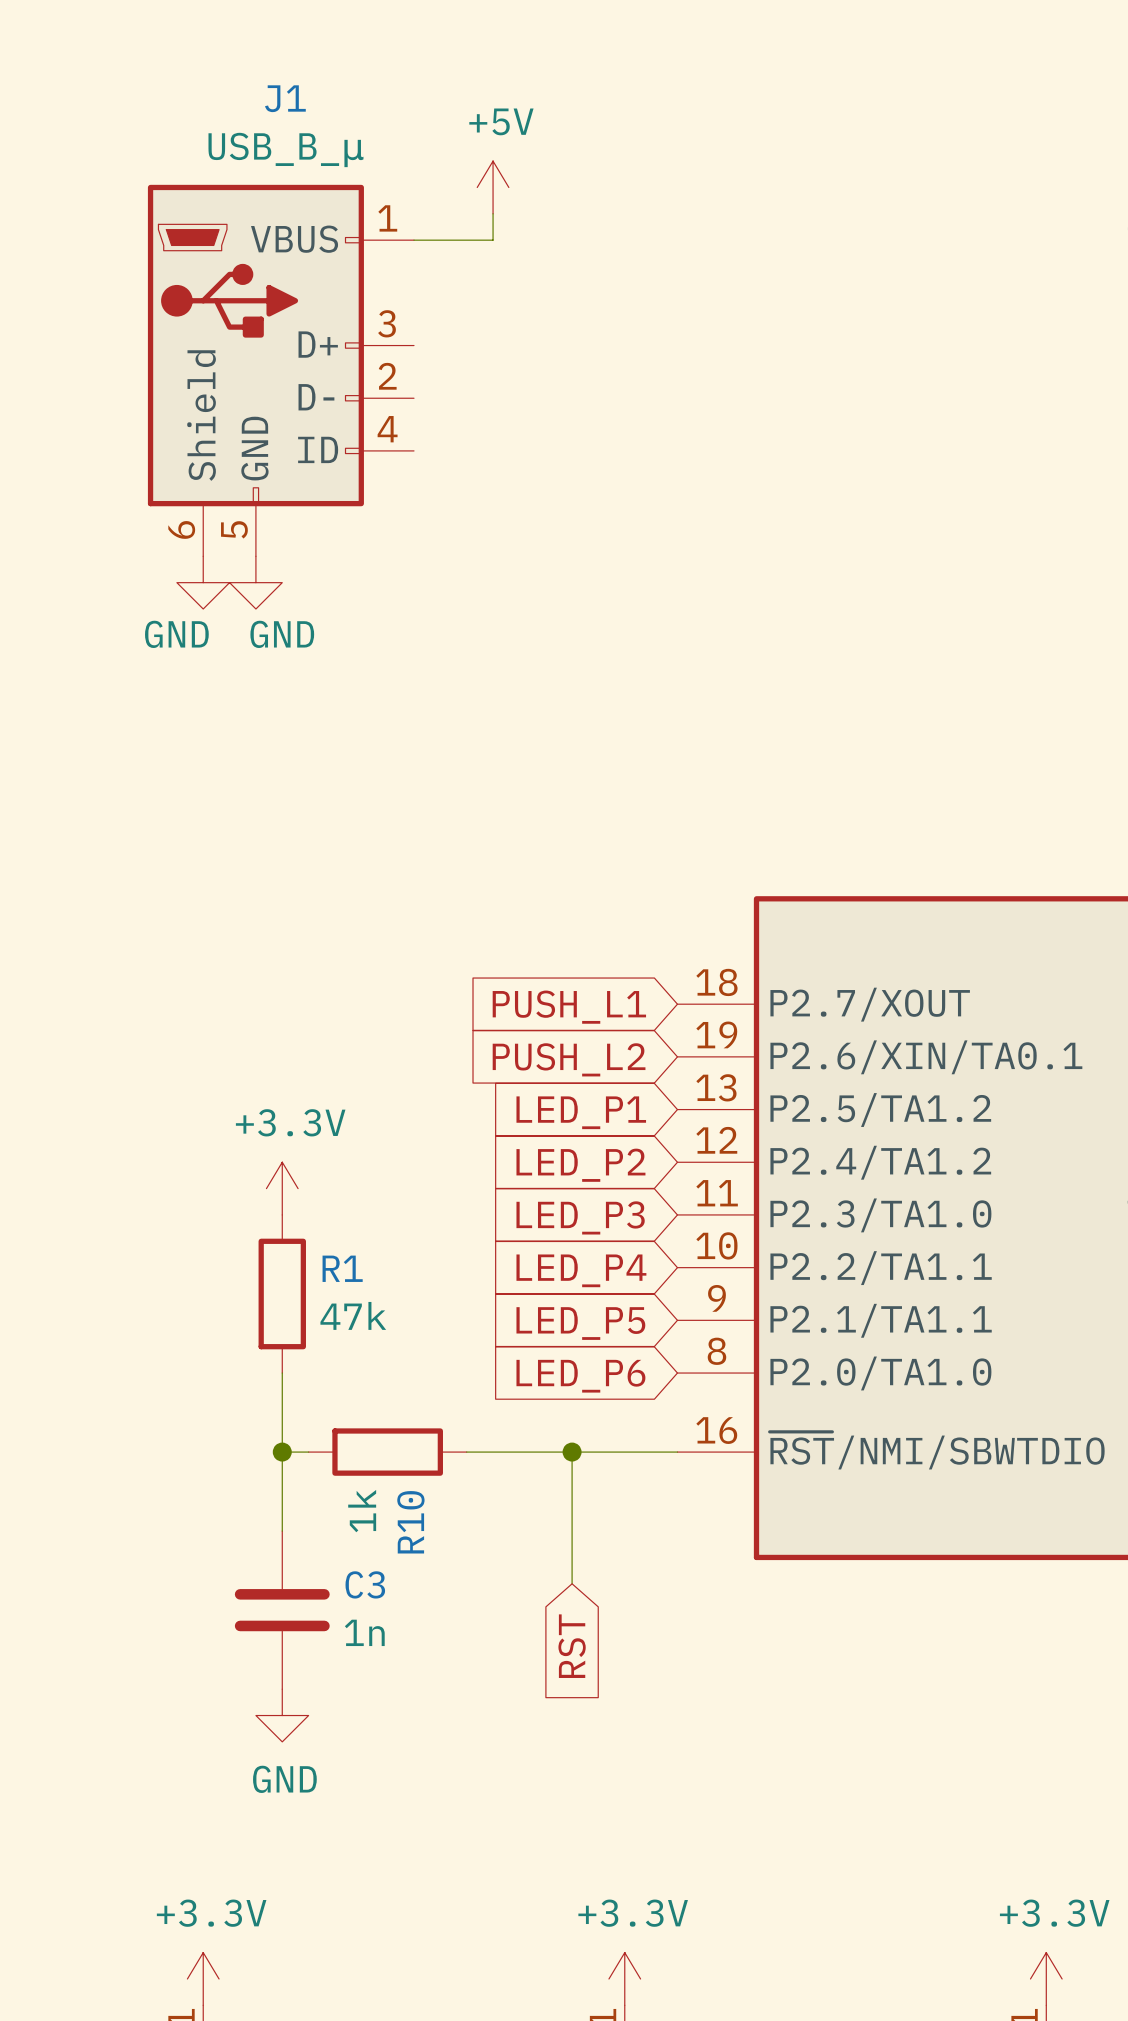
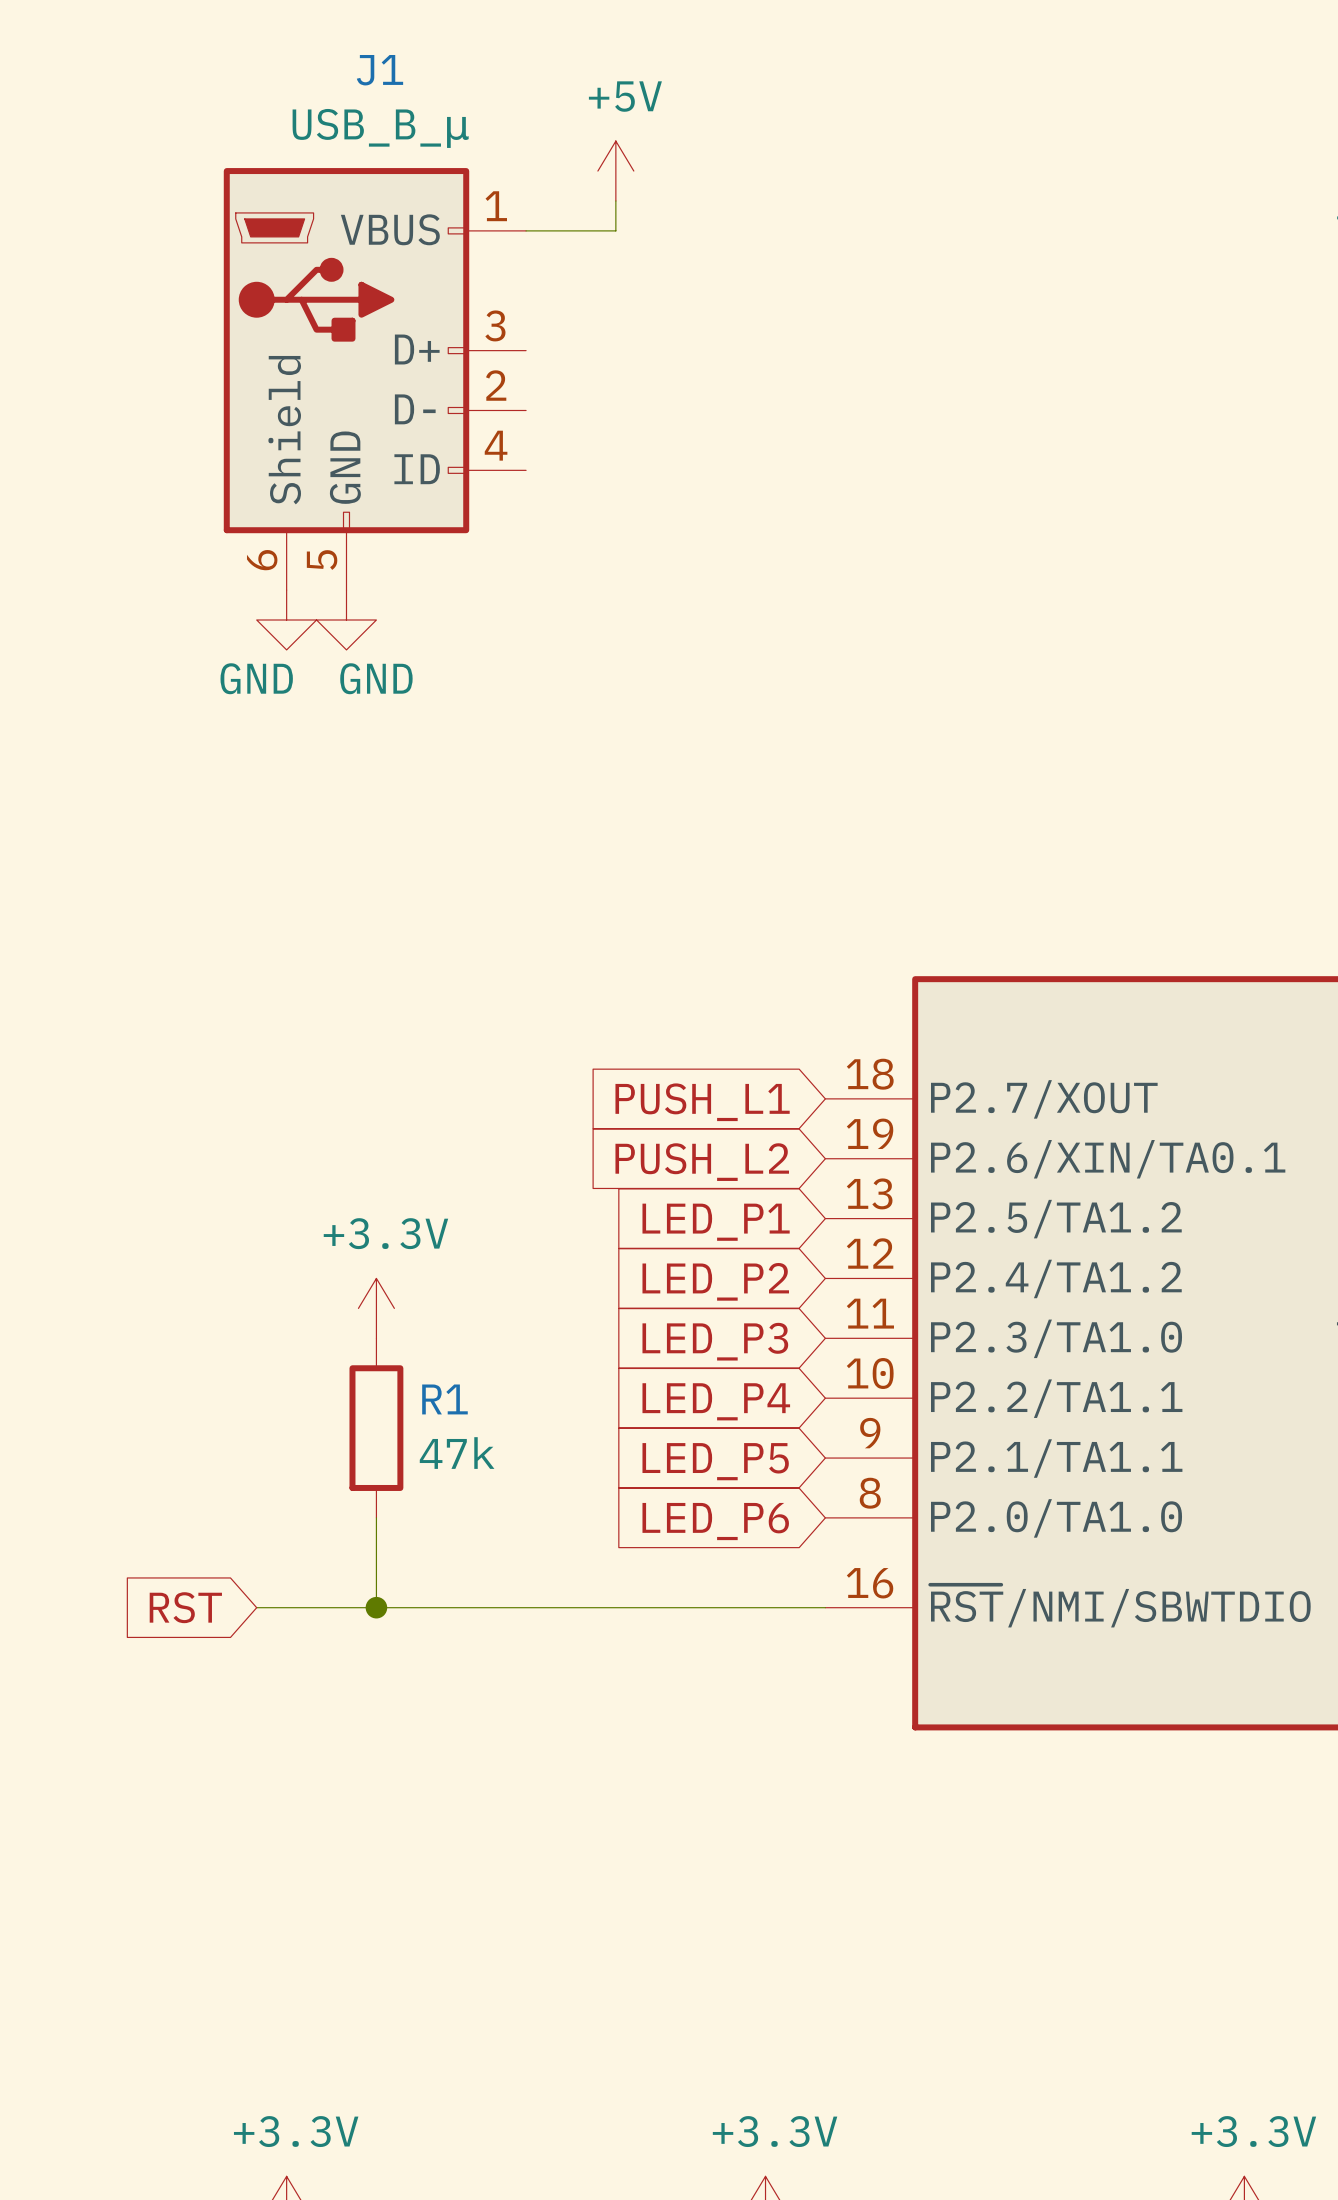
wire: (282, 1452) (282, 1531) -> (376, 1607) (256, 1607)
wire: none -> (406, 1607) (585, 1607)
R10: 1k (387, 1452) -> none
wire: (572, 1452) (572, 1583) -> none
junction: (572, 1452) -> none
C3: 1n (282, 1610) -> none
global label rotation: 0° (572, 1646) -> 90° clockwise (185, 1607)
global label position: RST (572, 1646) -> RST (185, 1607)
power symbol: GND (282, 1715) -> none

